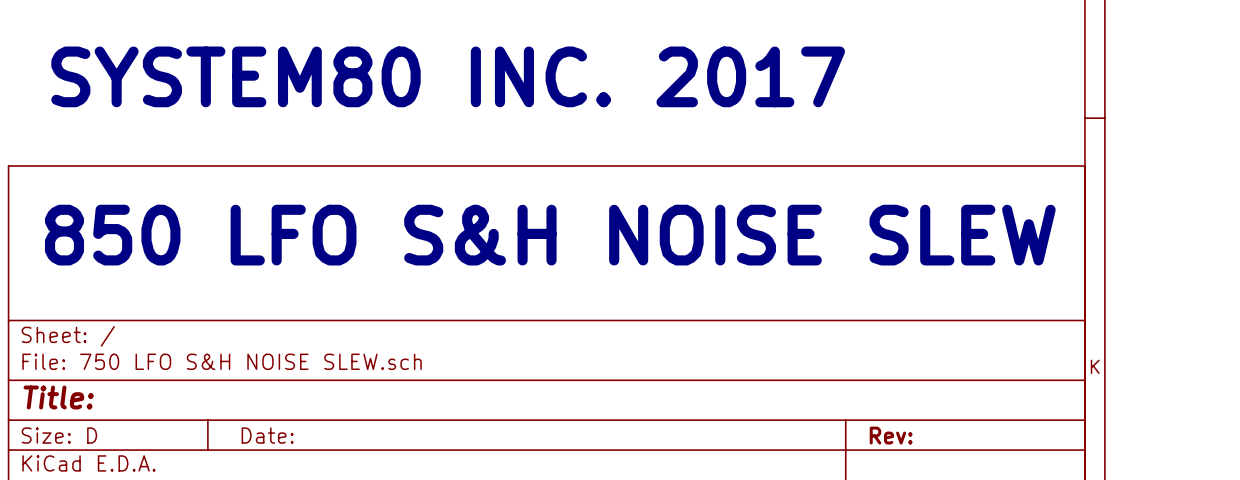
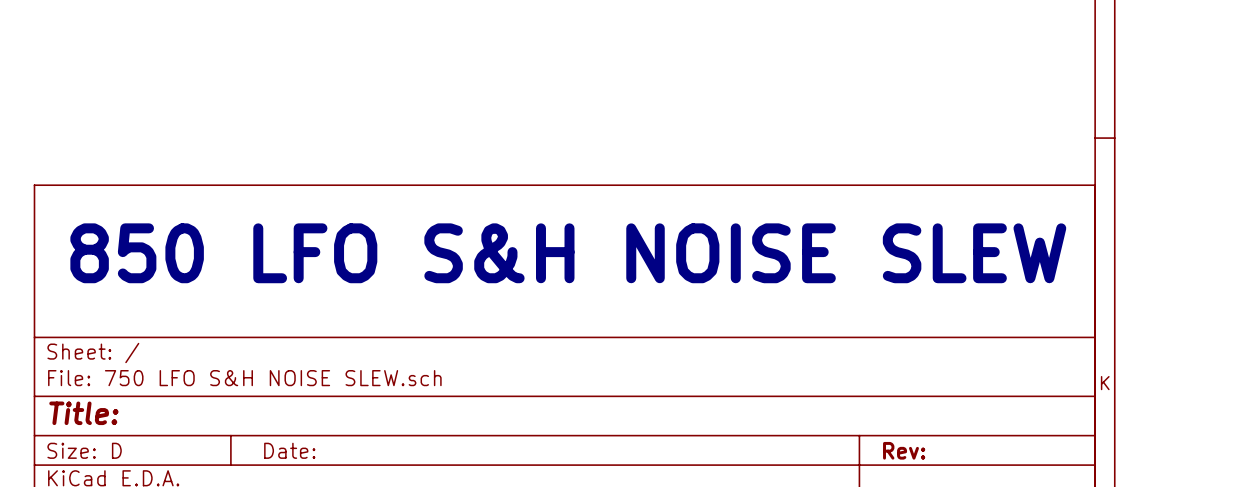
text: SYSTEM80 INC. 2017 (448, 76) -> none

